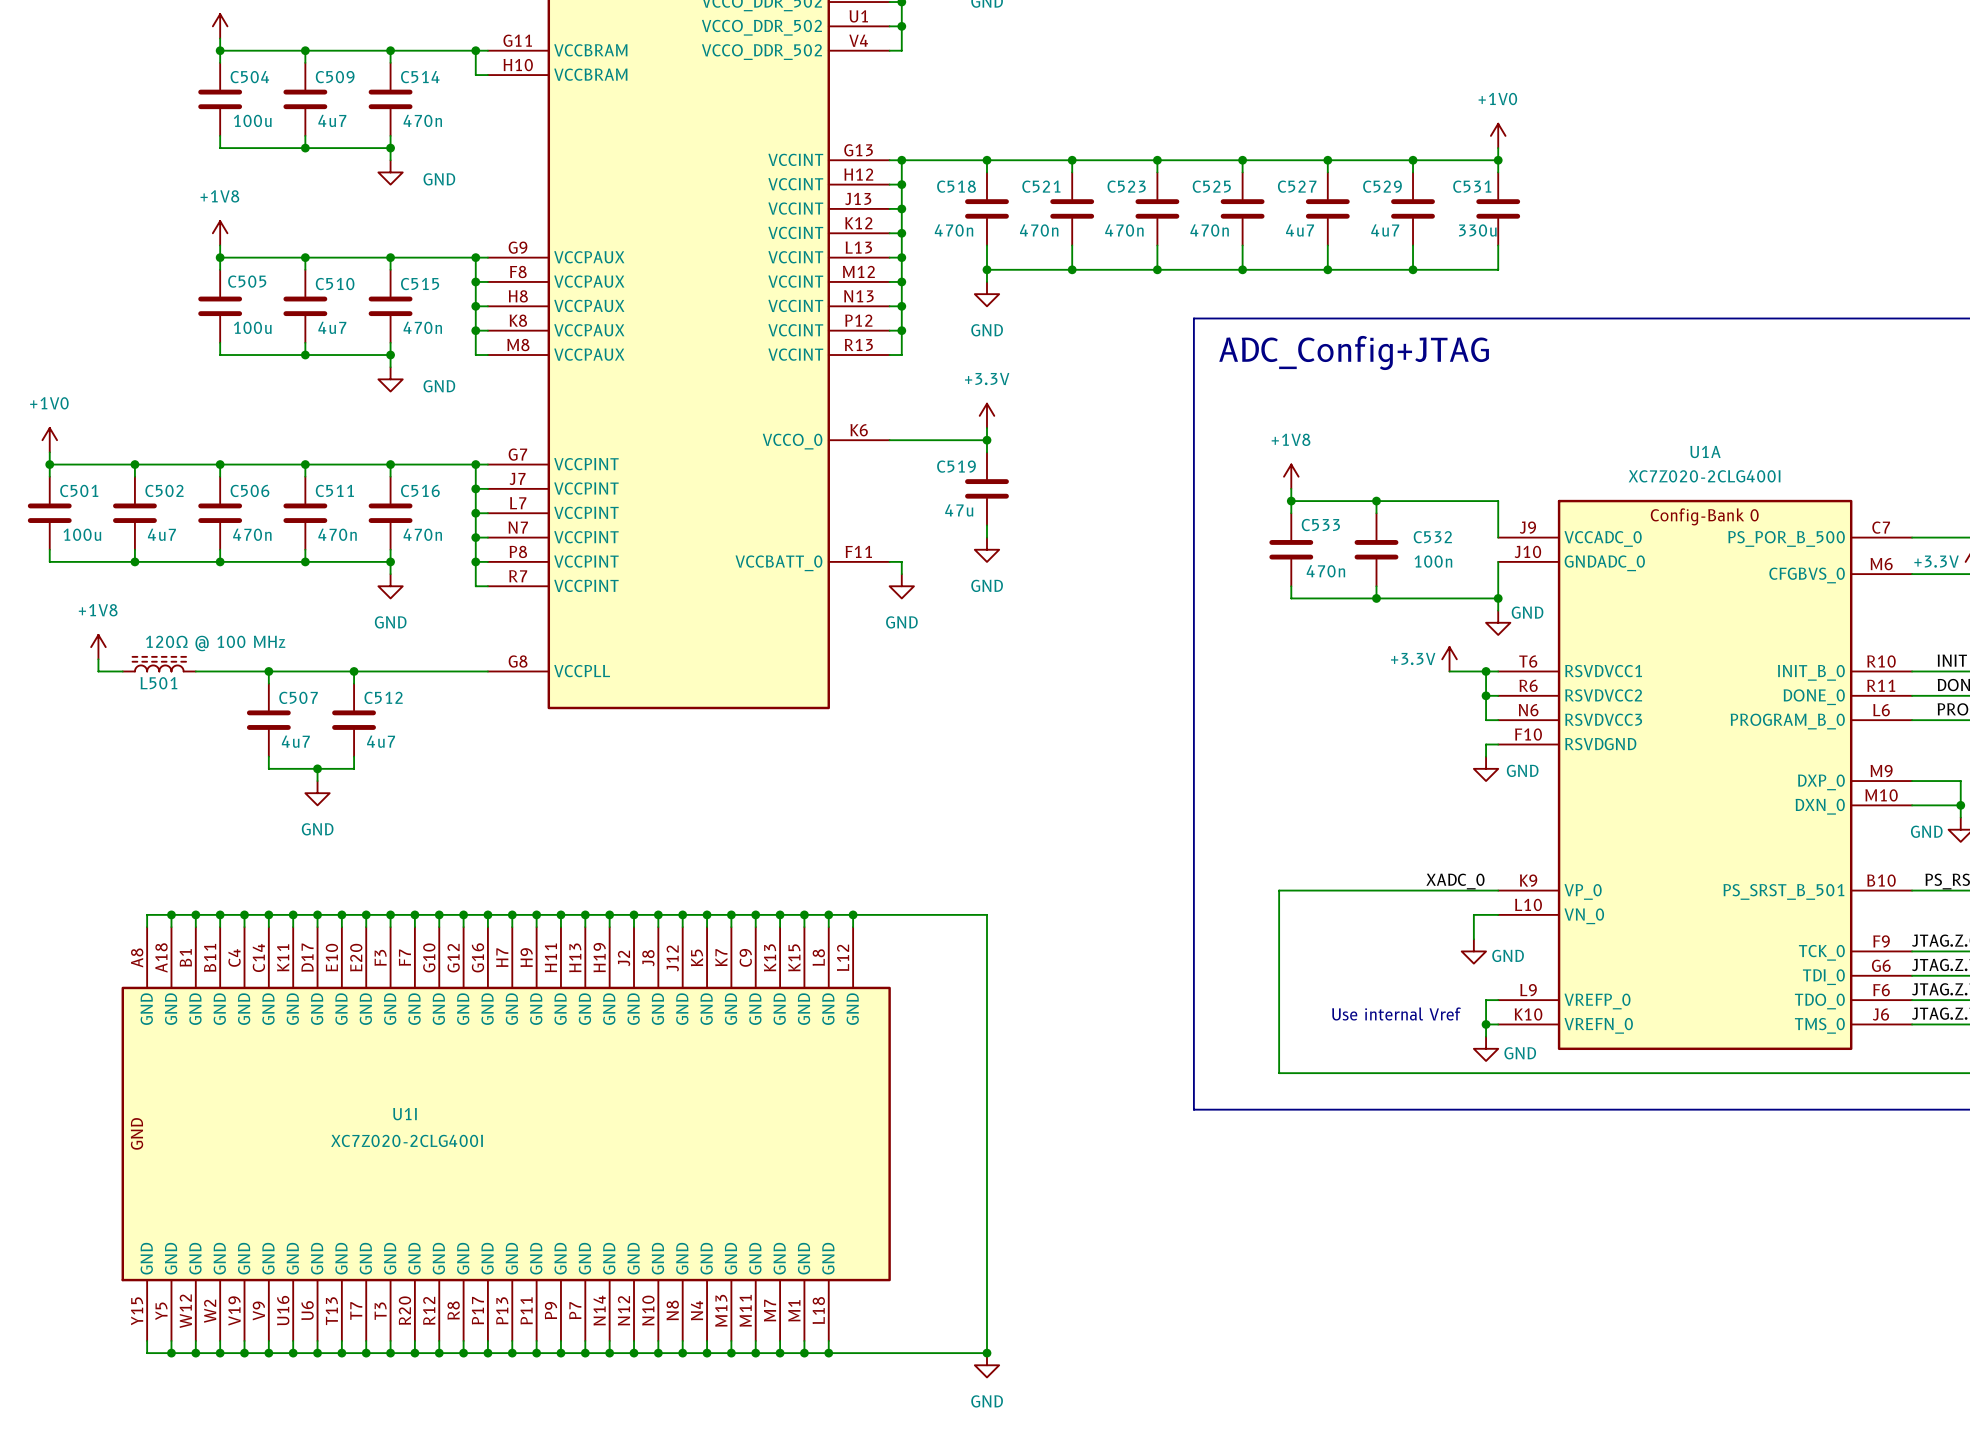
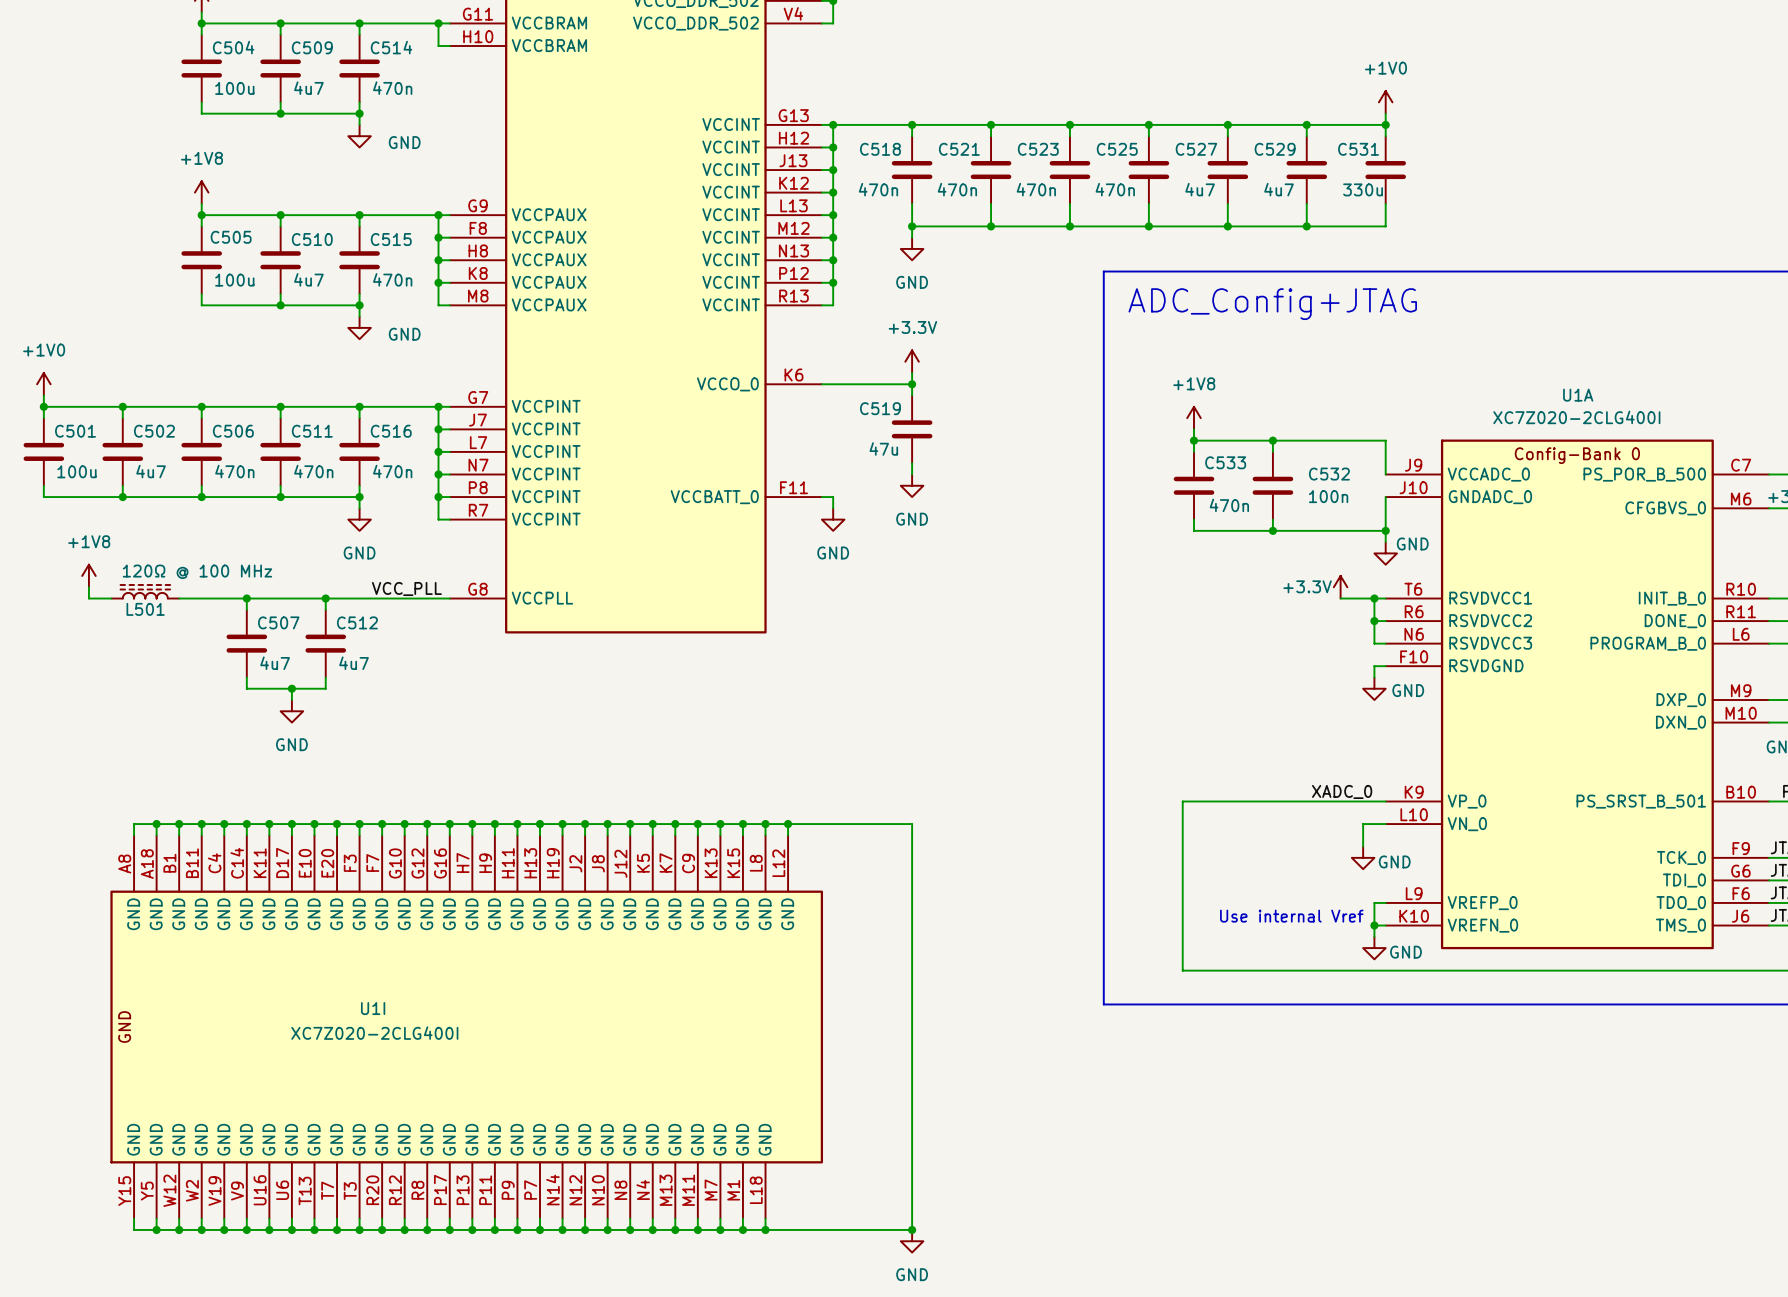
label: none -> VCC_PLL (406, 589)

